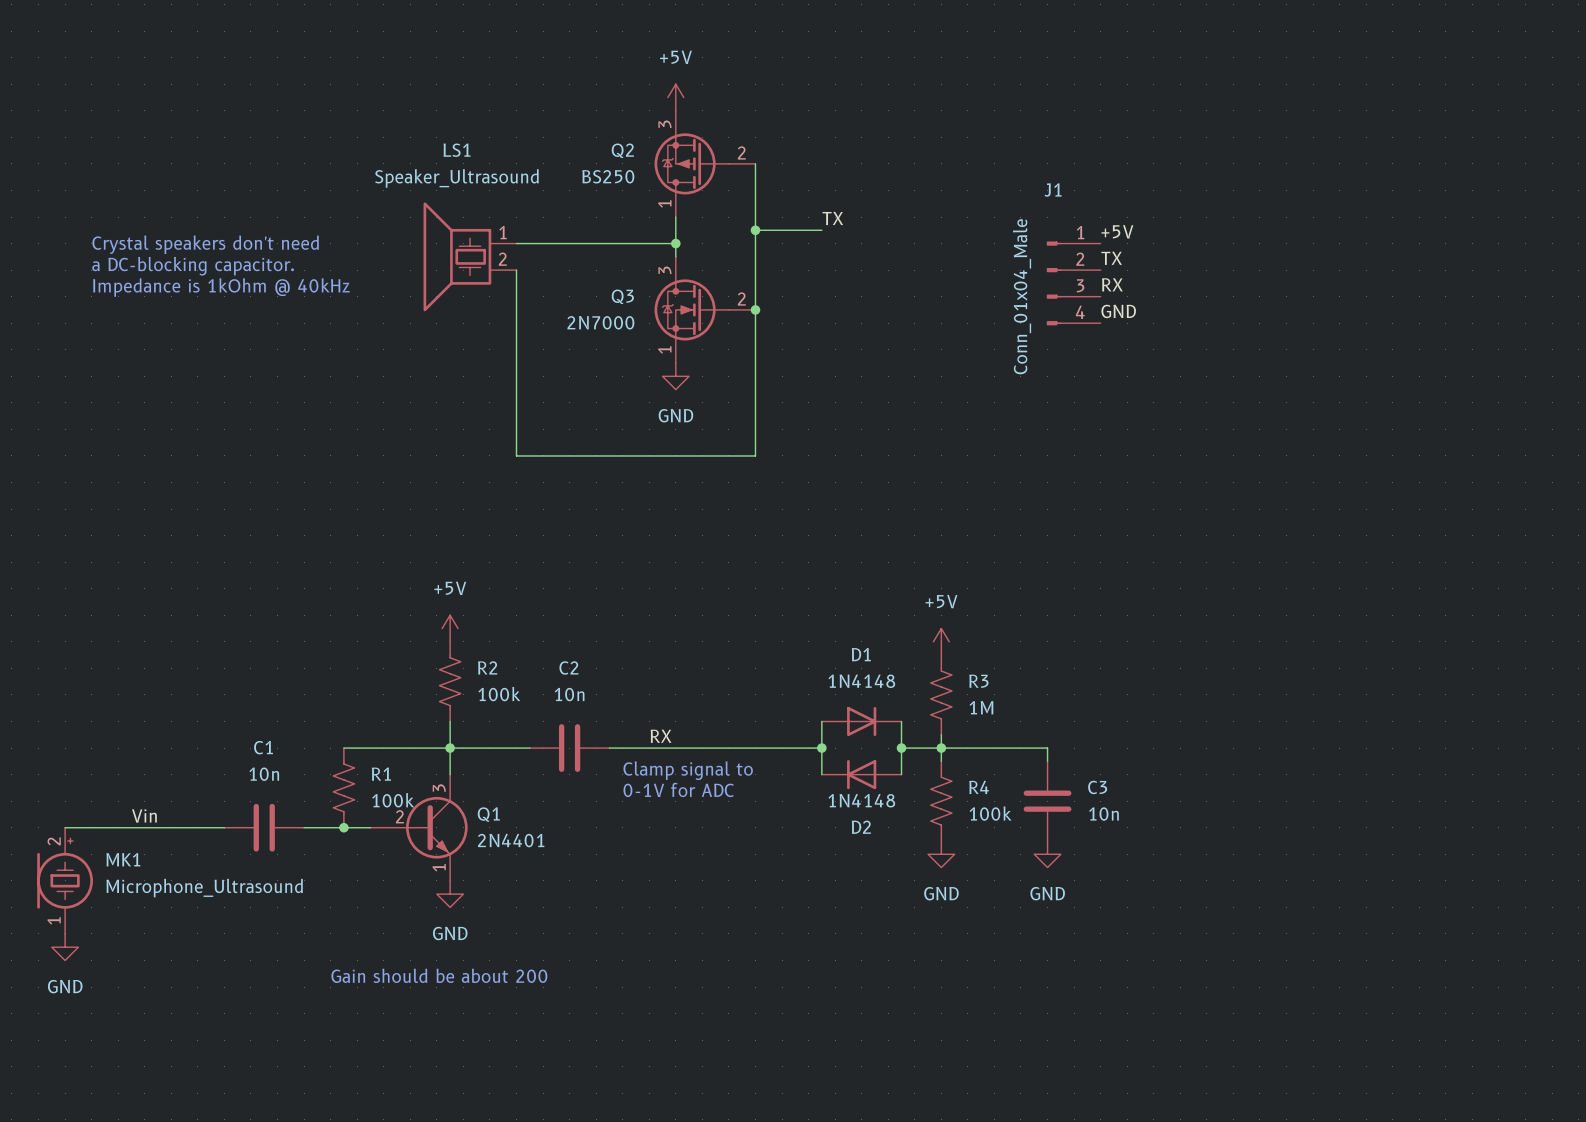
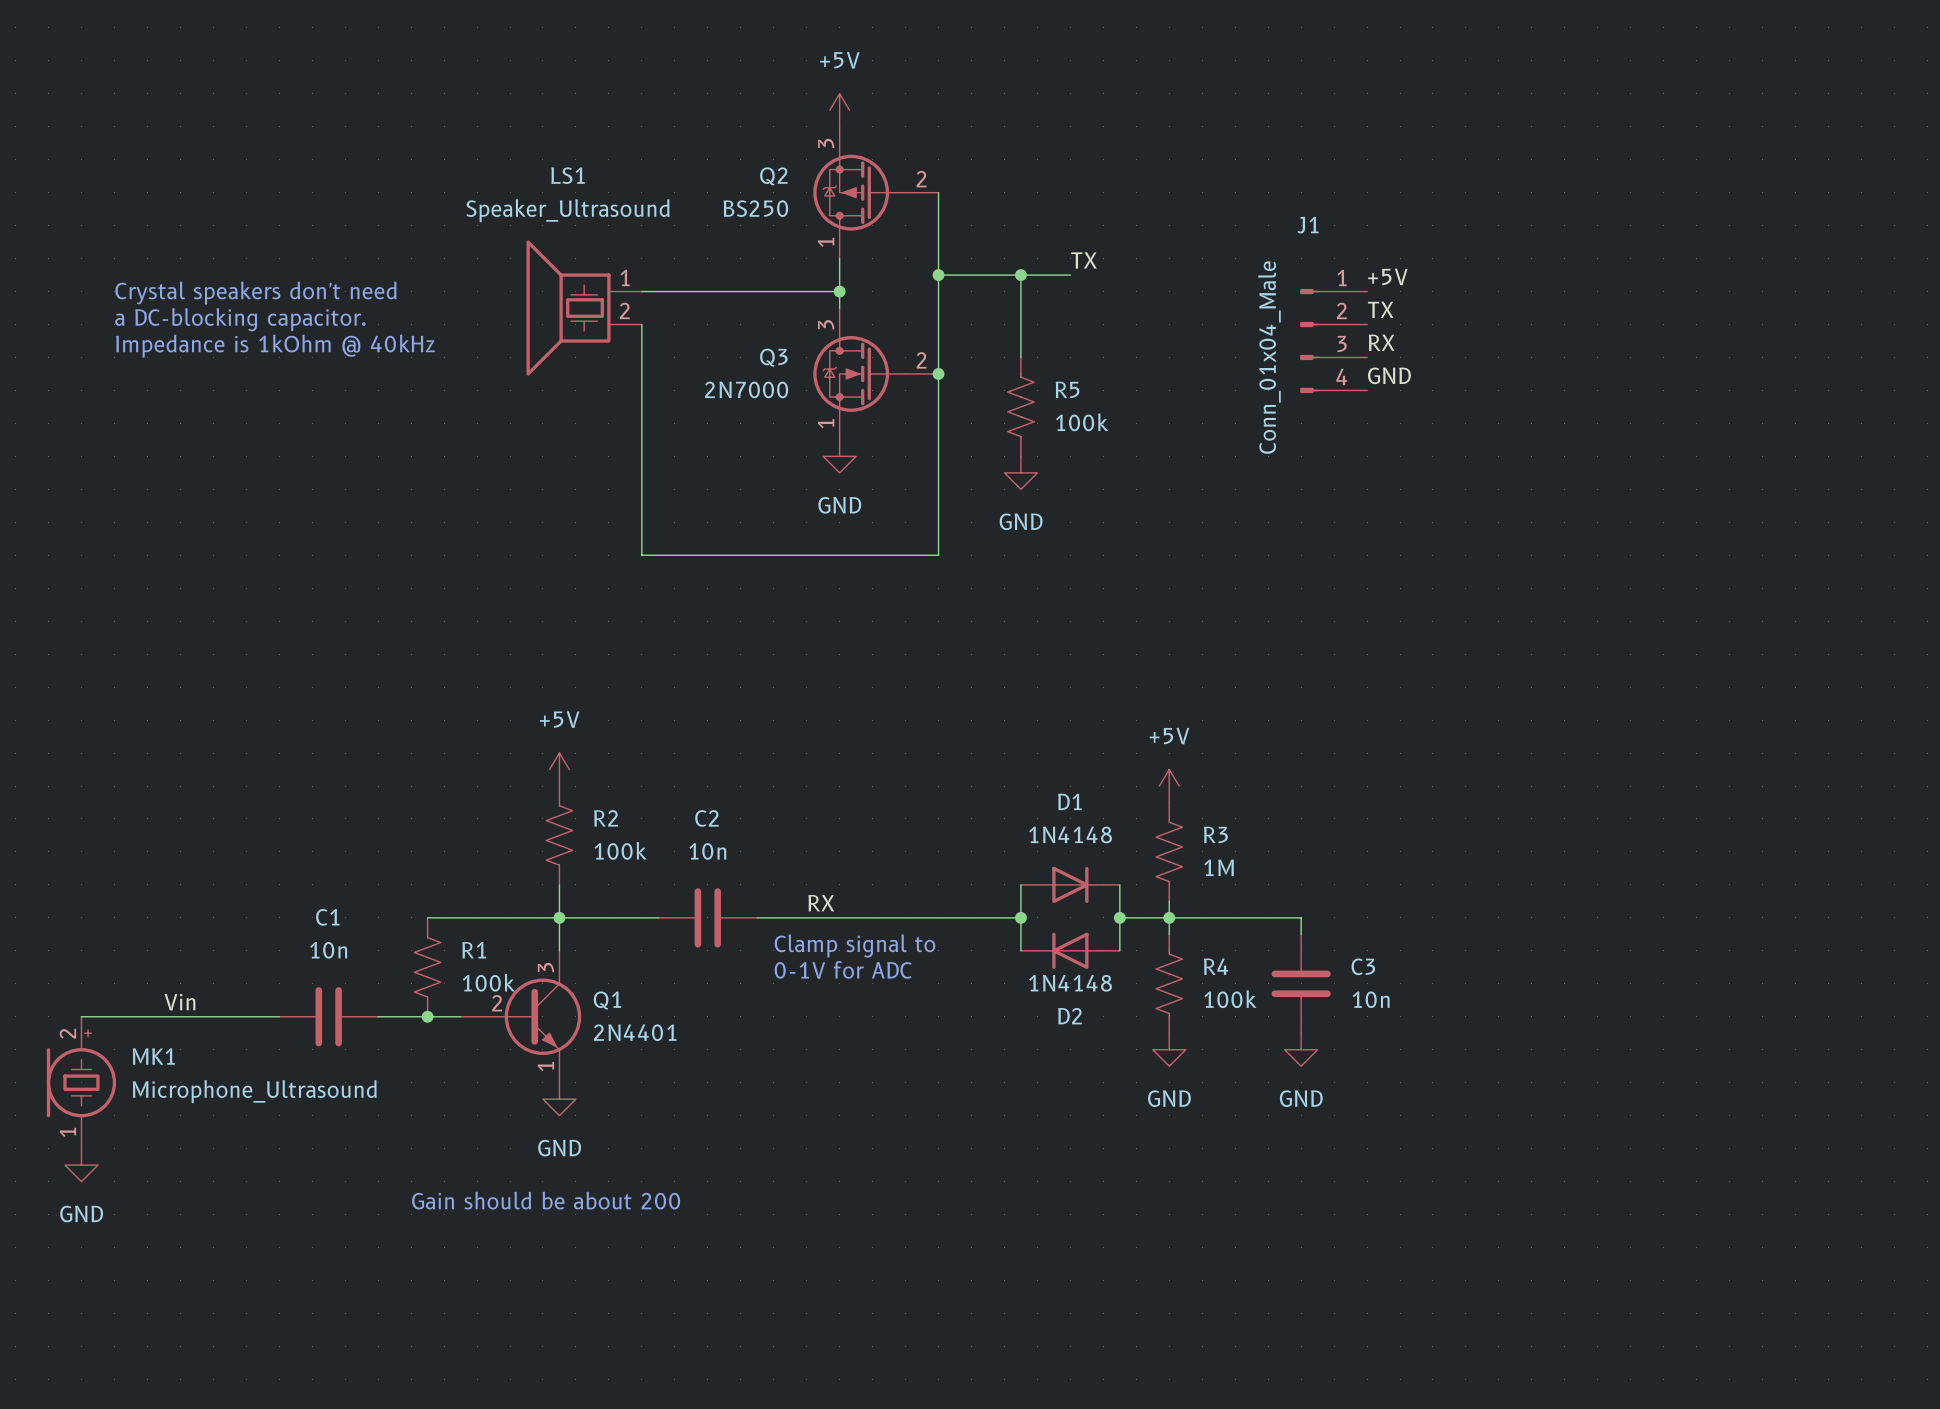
label position: TX (832, 218) -> TX (1084, 260)
junction: none -> (1020, 275)
wire: none -> (1070, 275) (1020, 275) (1020, 357)
R5: none -> 100k (1020, 406)
power symbol: none -> GND (1020, 472)

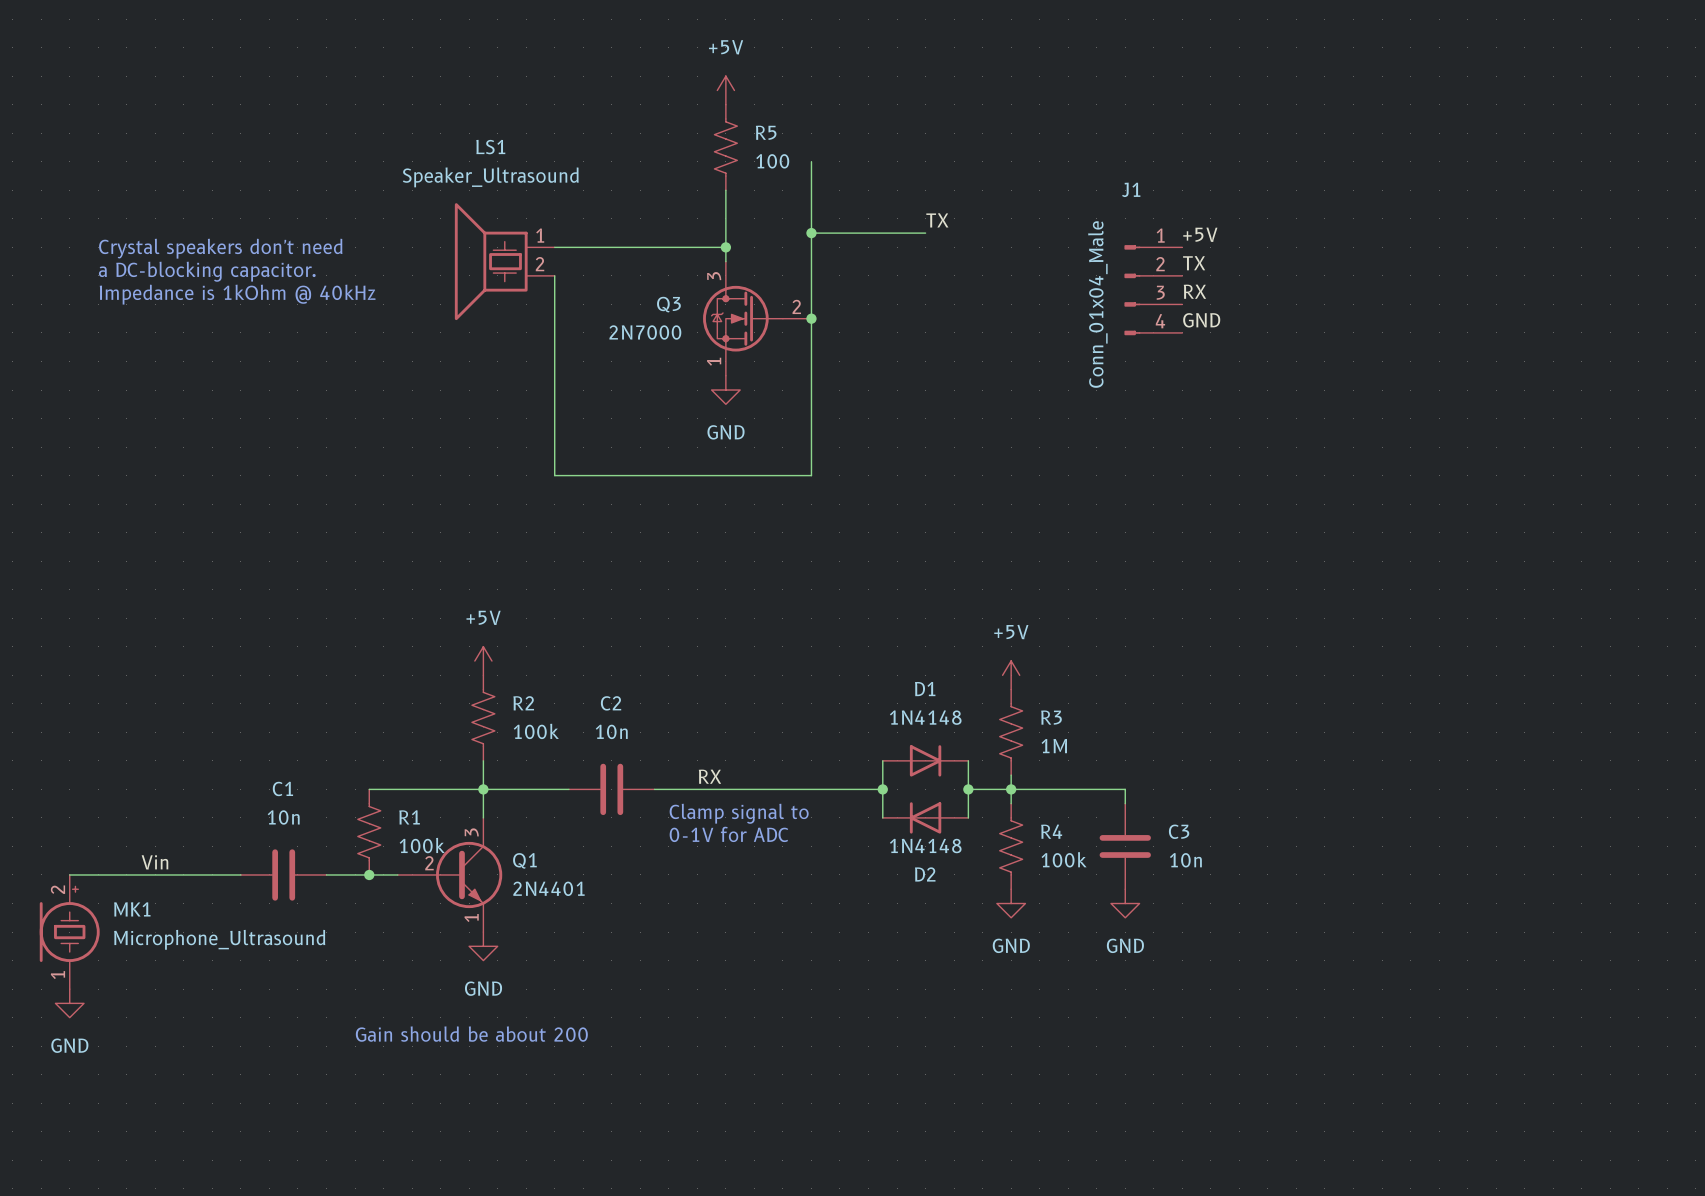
Q2: BS250 (875, 192) -> none
wire: (1020, 275) (1020, 357) -> none
junction: (1020, 275) -> none
R5 position: (1020, 406) -> (725, 147)
R5 value: 100k (1082, 422) -> 100 (772, 161)
power symbol: GND (1020, 472) -> none

